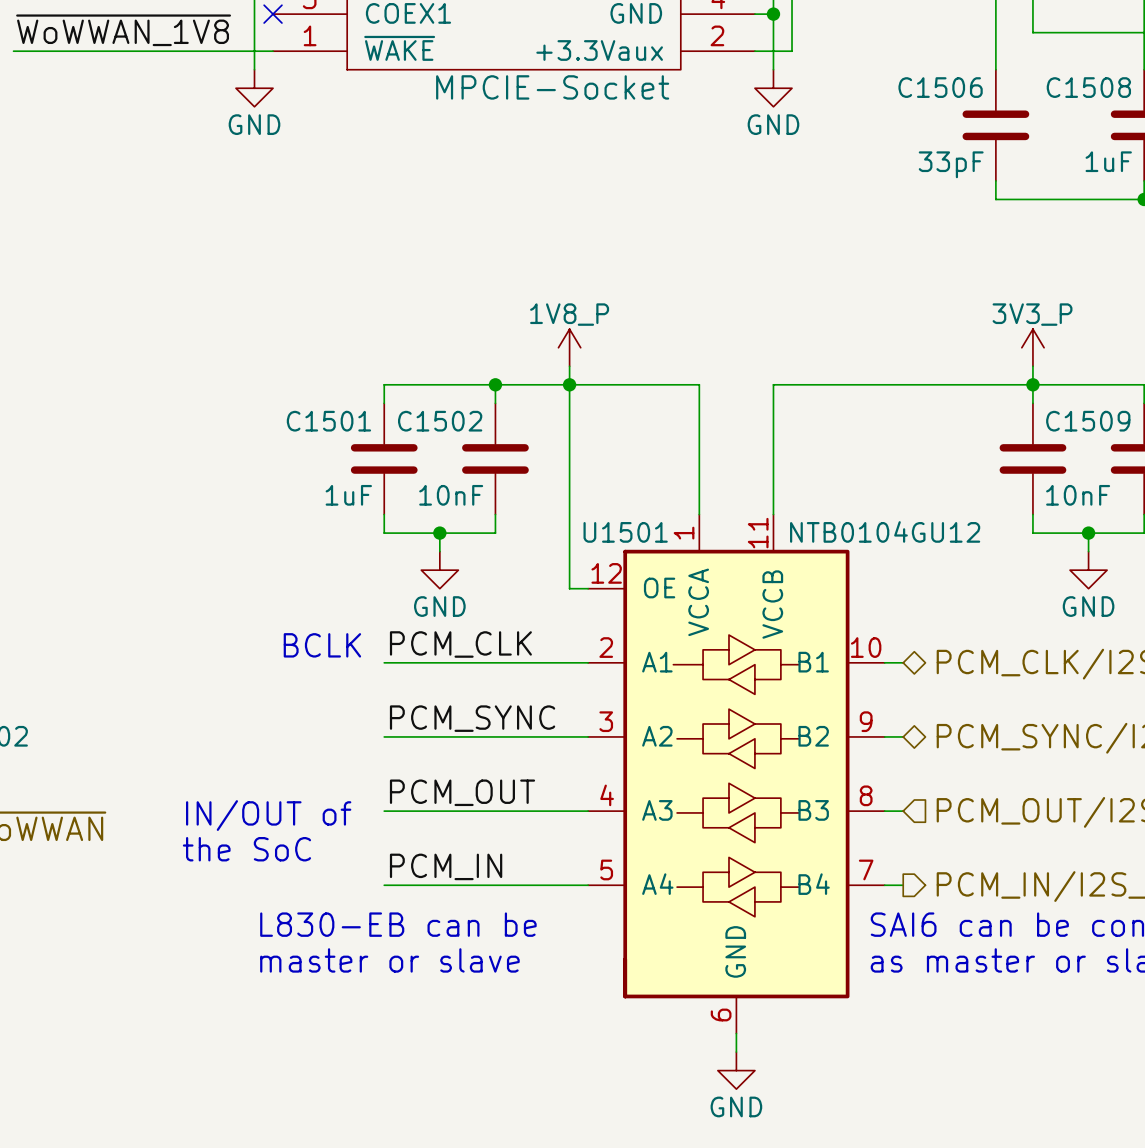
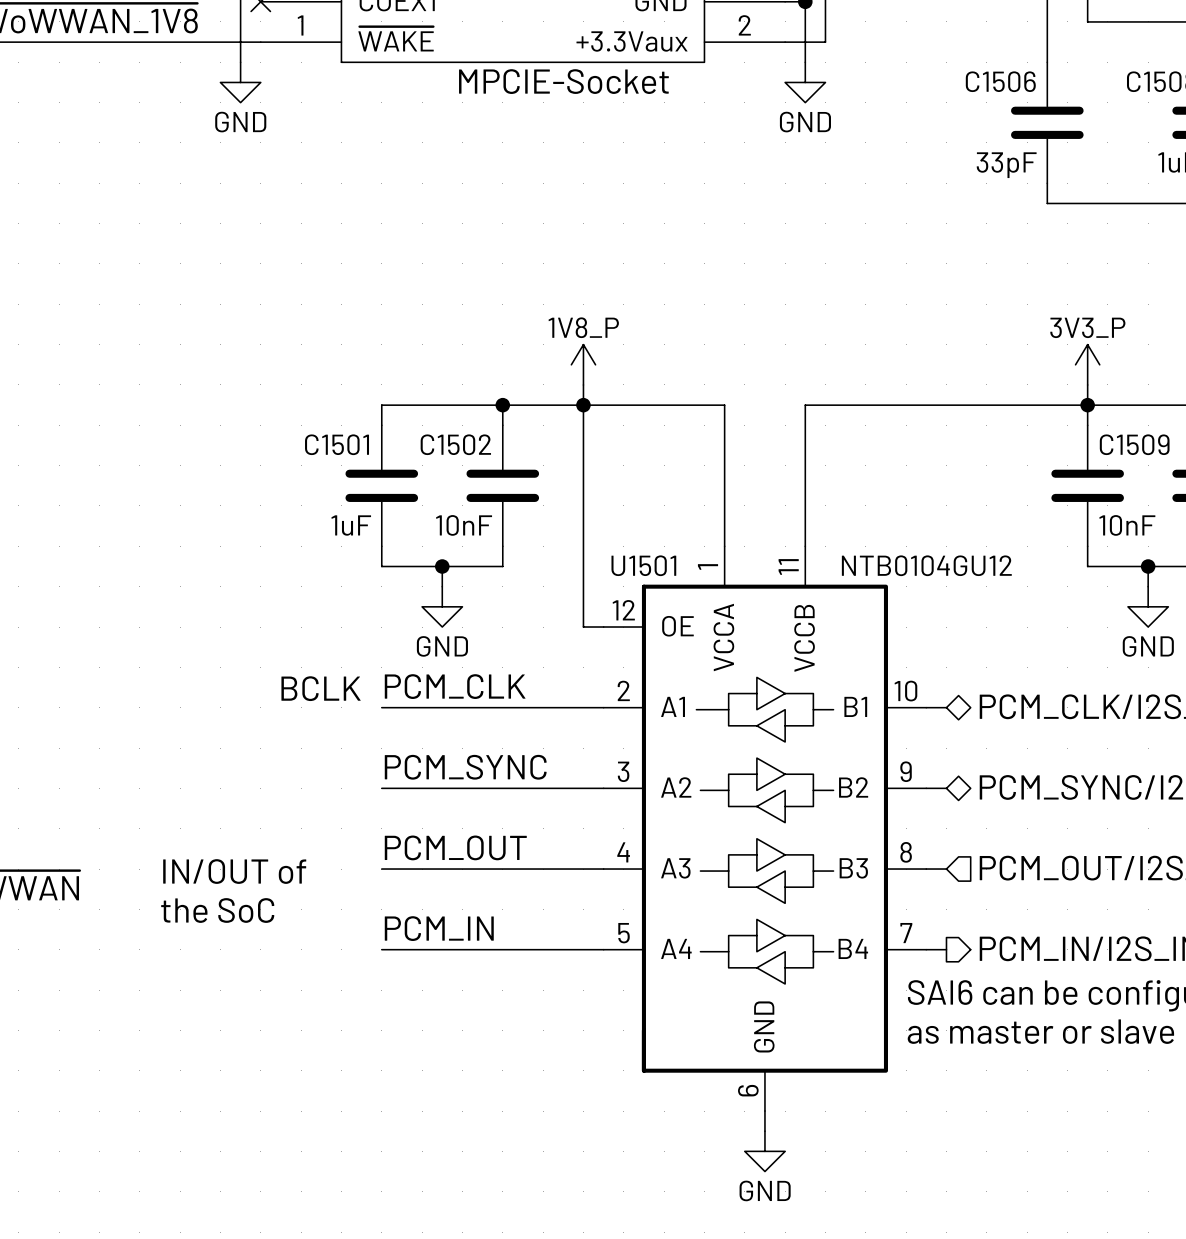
text: L830-EB can be (398, 924) -> none
text: master or slave (389, 960) -> none

